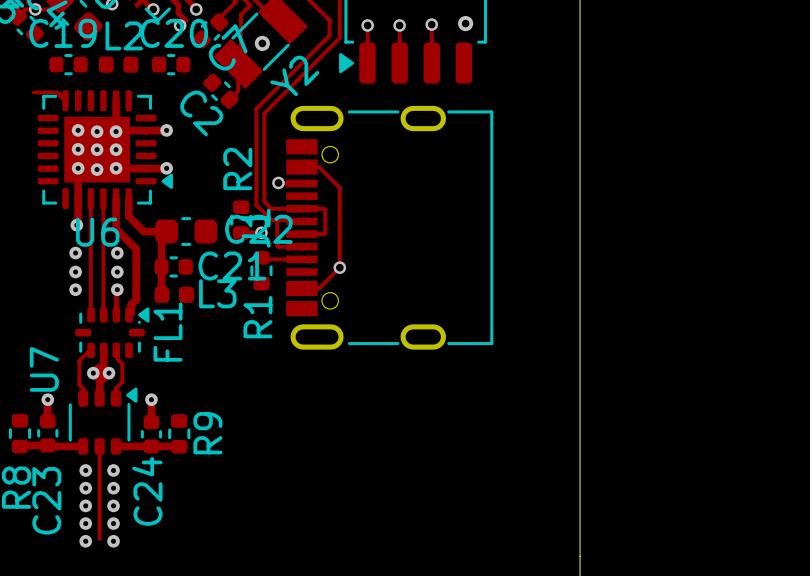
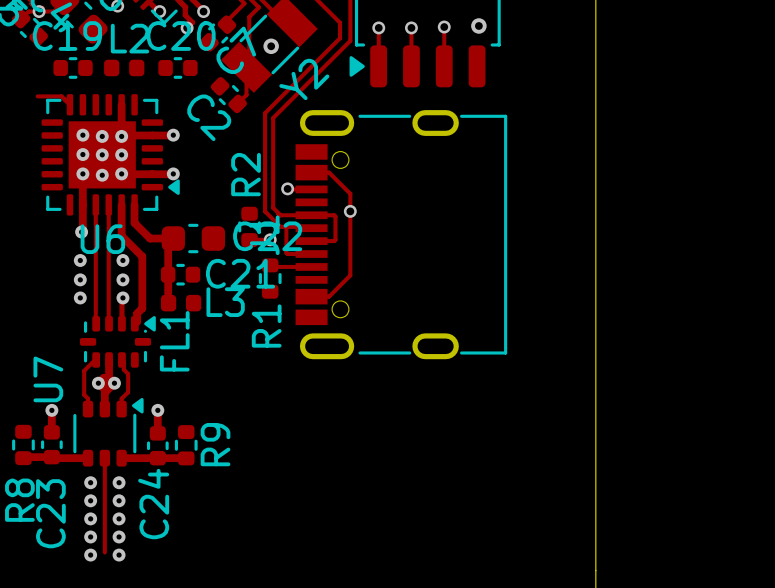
via position: (339, 267) -> (350, 211)

